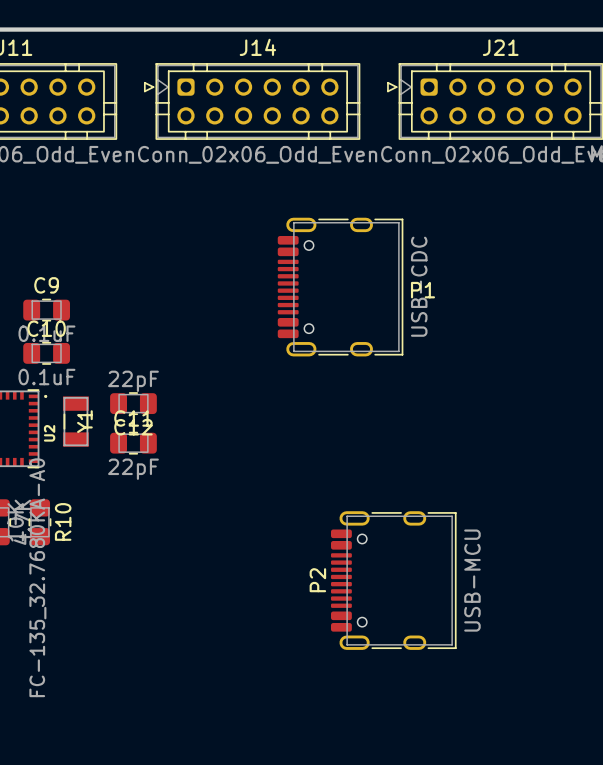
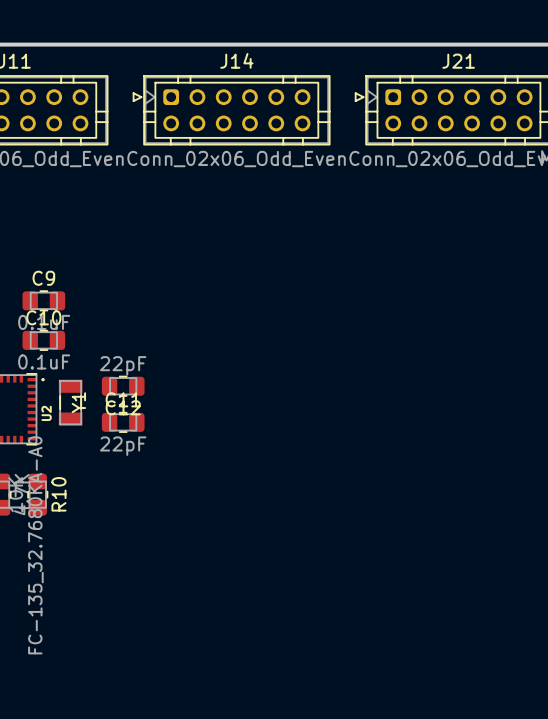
P1: USB-CDC (340, 287) -> none
P2: USB-MCU (393, 580) -> none

